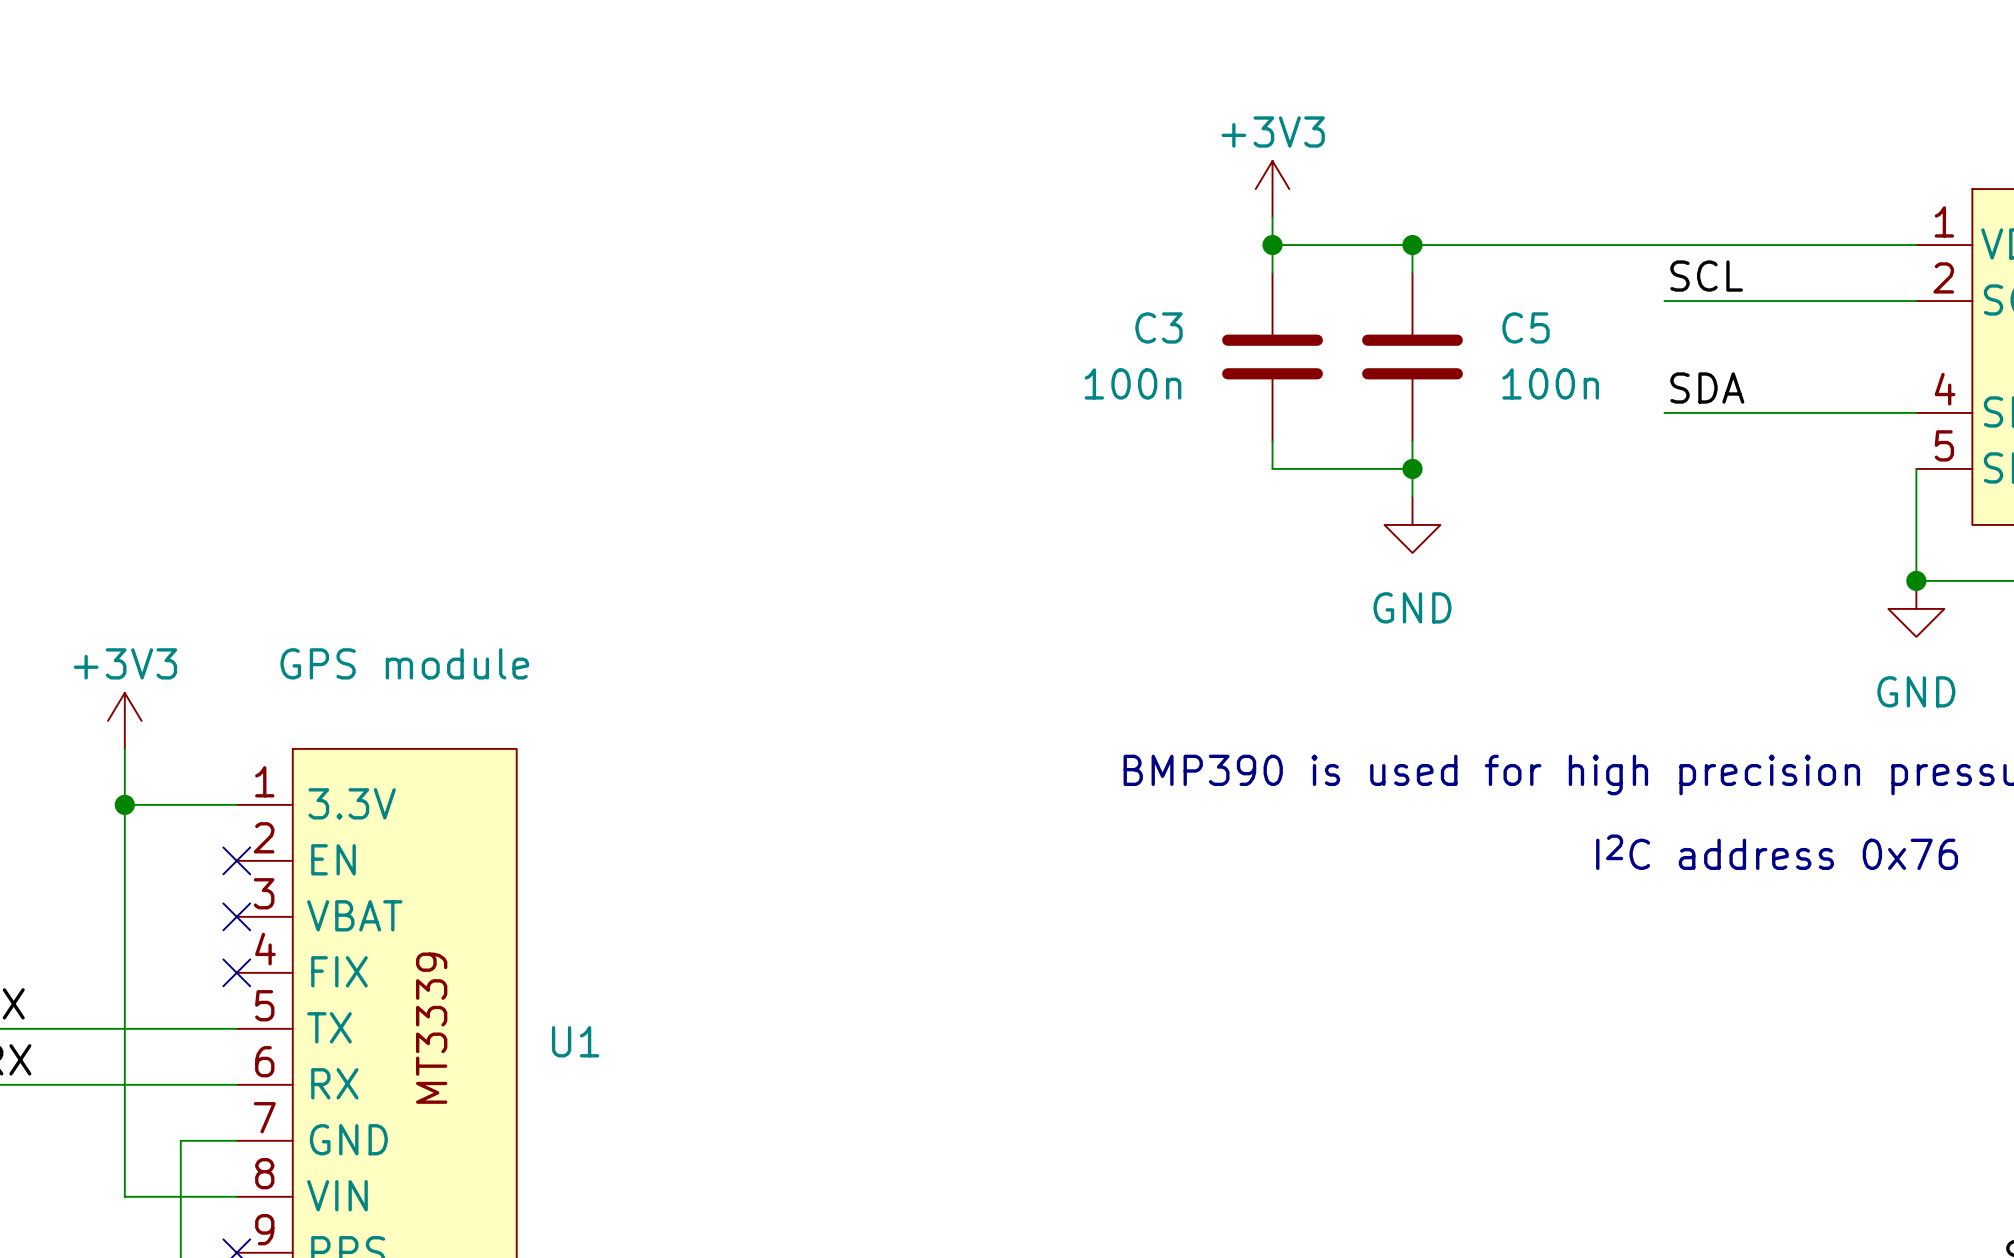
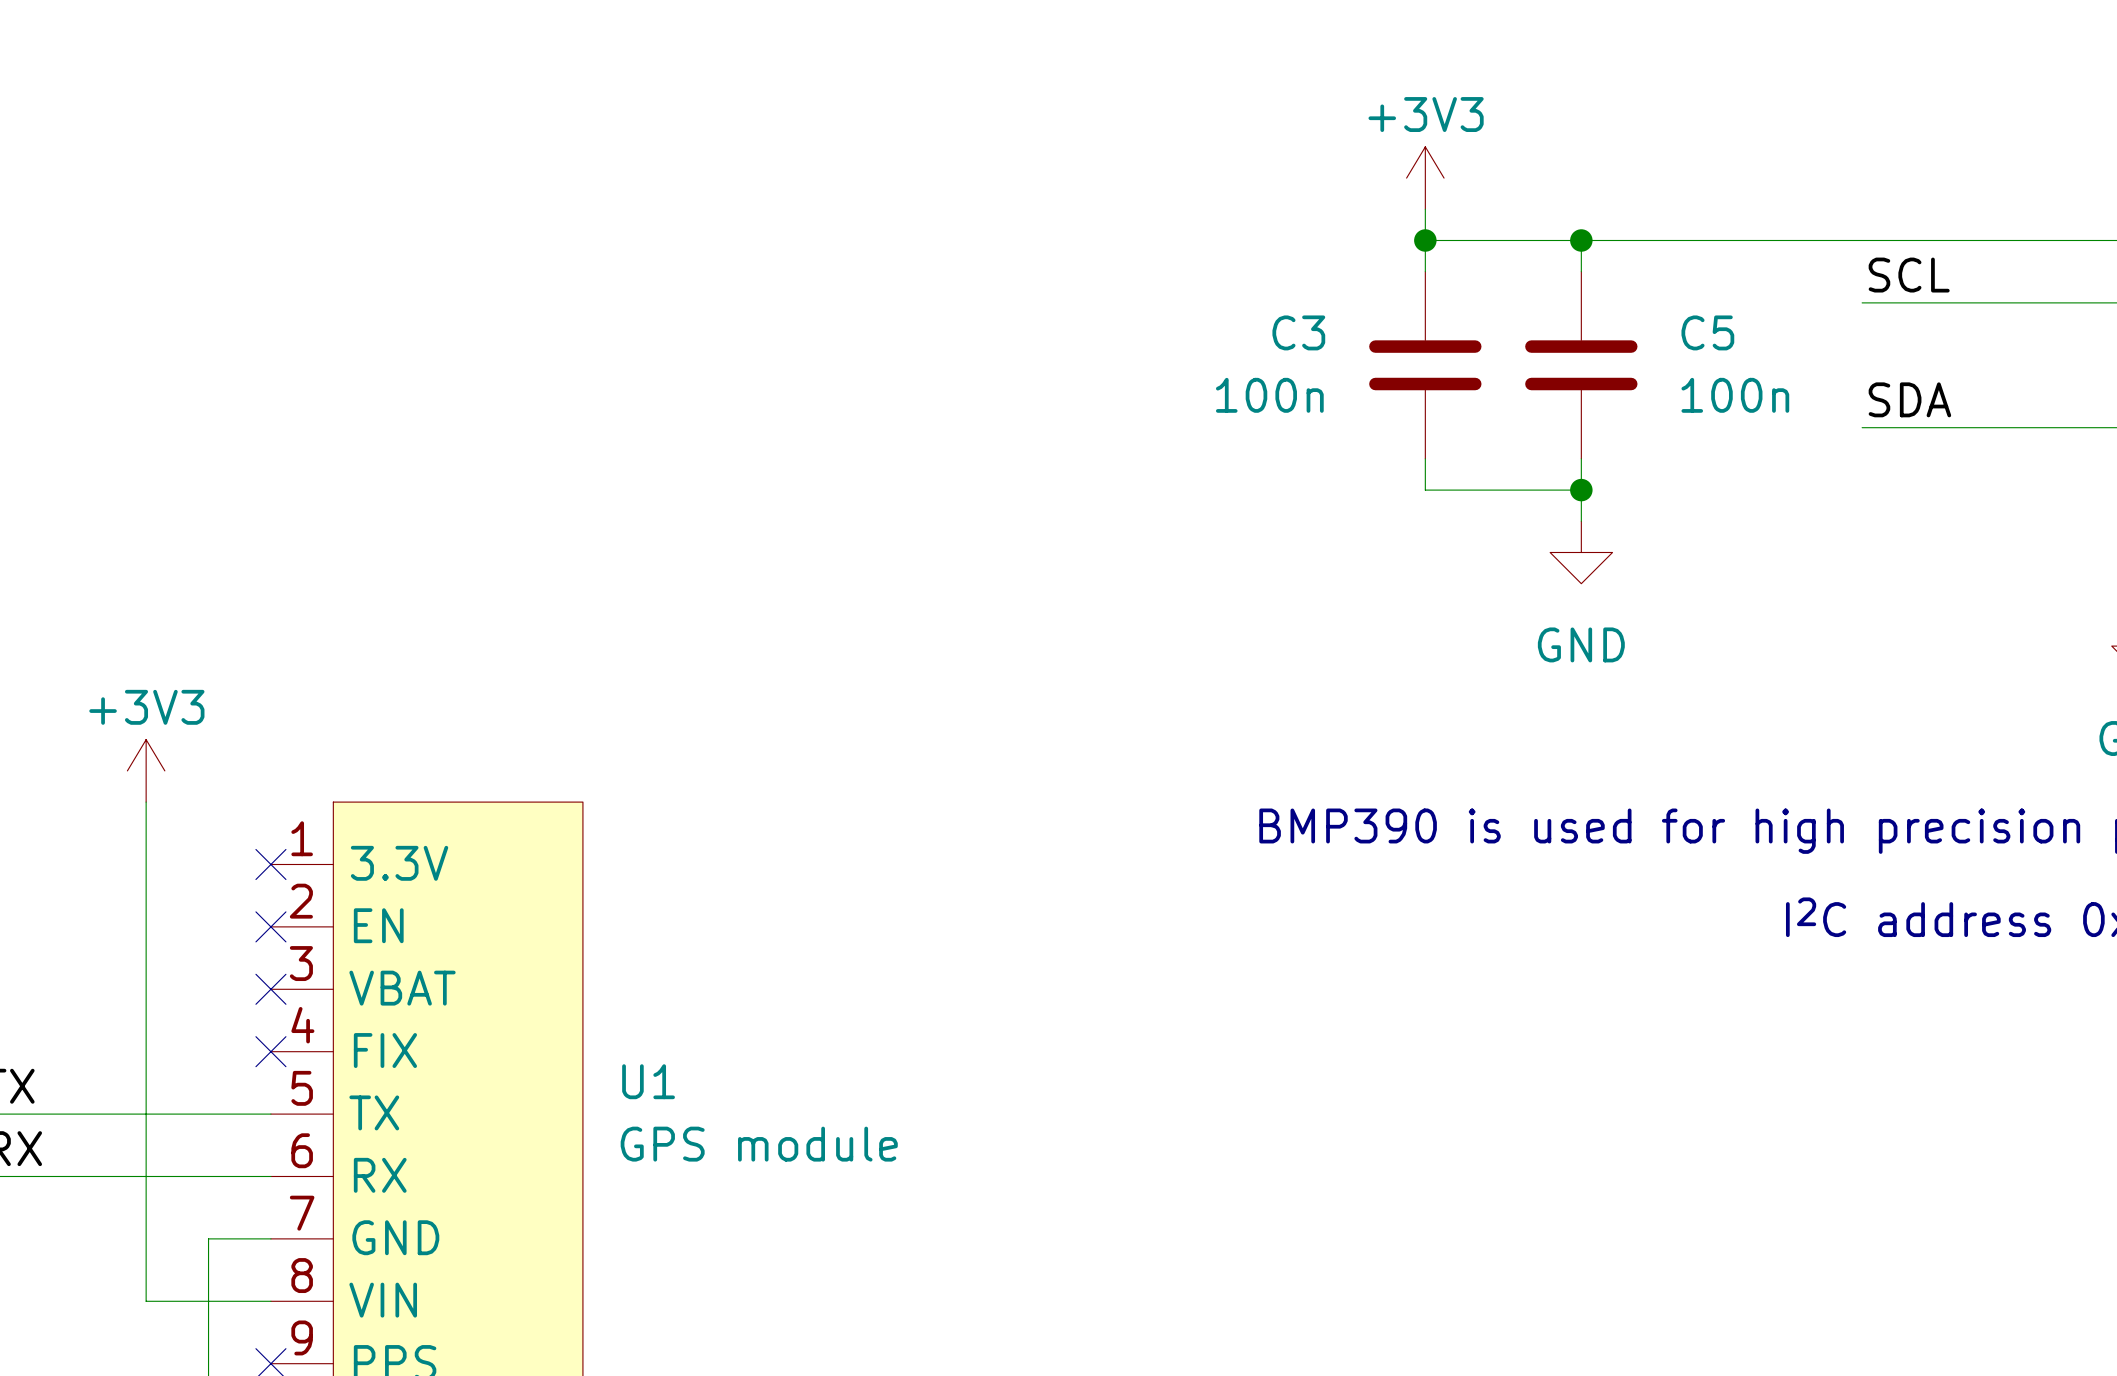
U1 value position: GPS module (404, 663) -> GPS module (759, 1144)
wire: (124, 804) (236, 804) -> none
junction: (124, 804) -> none
no-connect mark: none -> (270, 864)
U1 text: MT3339 (431, 1028) -> none
U1 name position: U1 (575, 1041) -> U1 (648, 1081)

